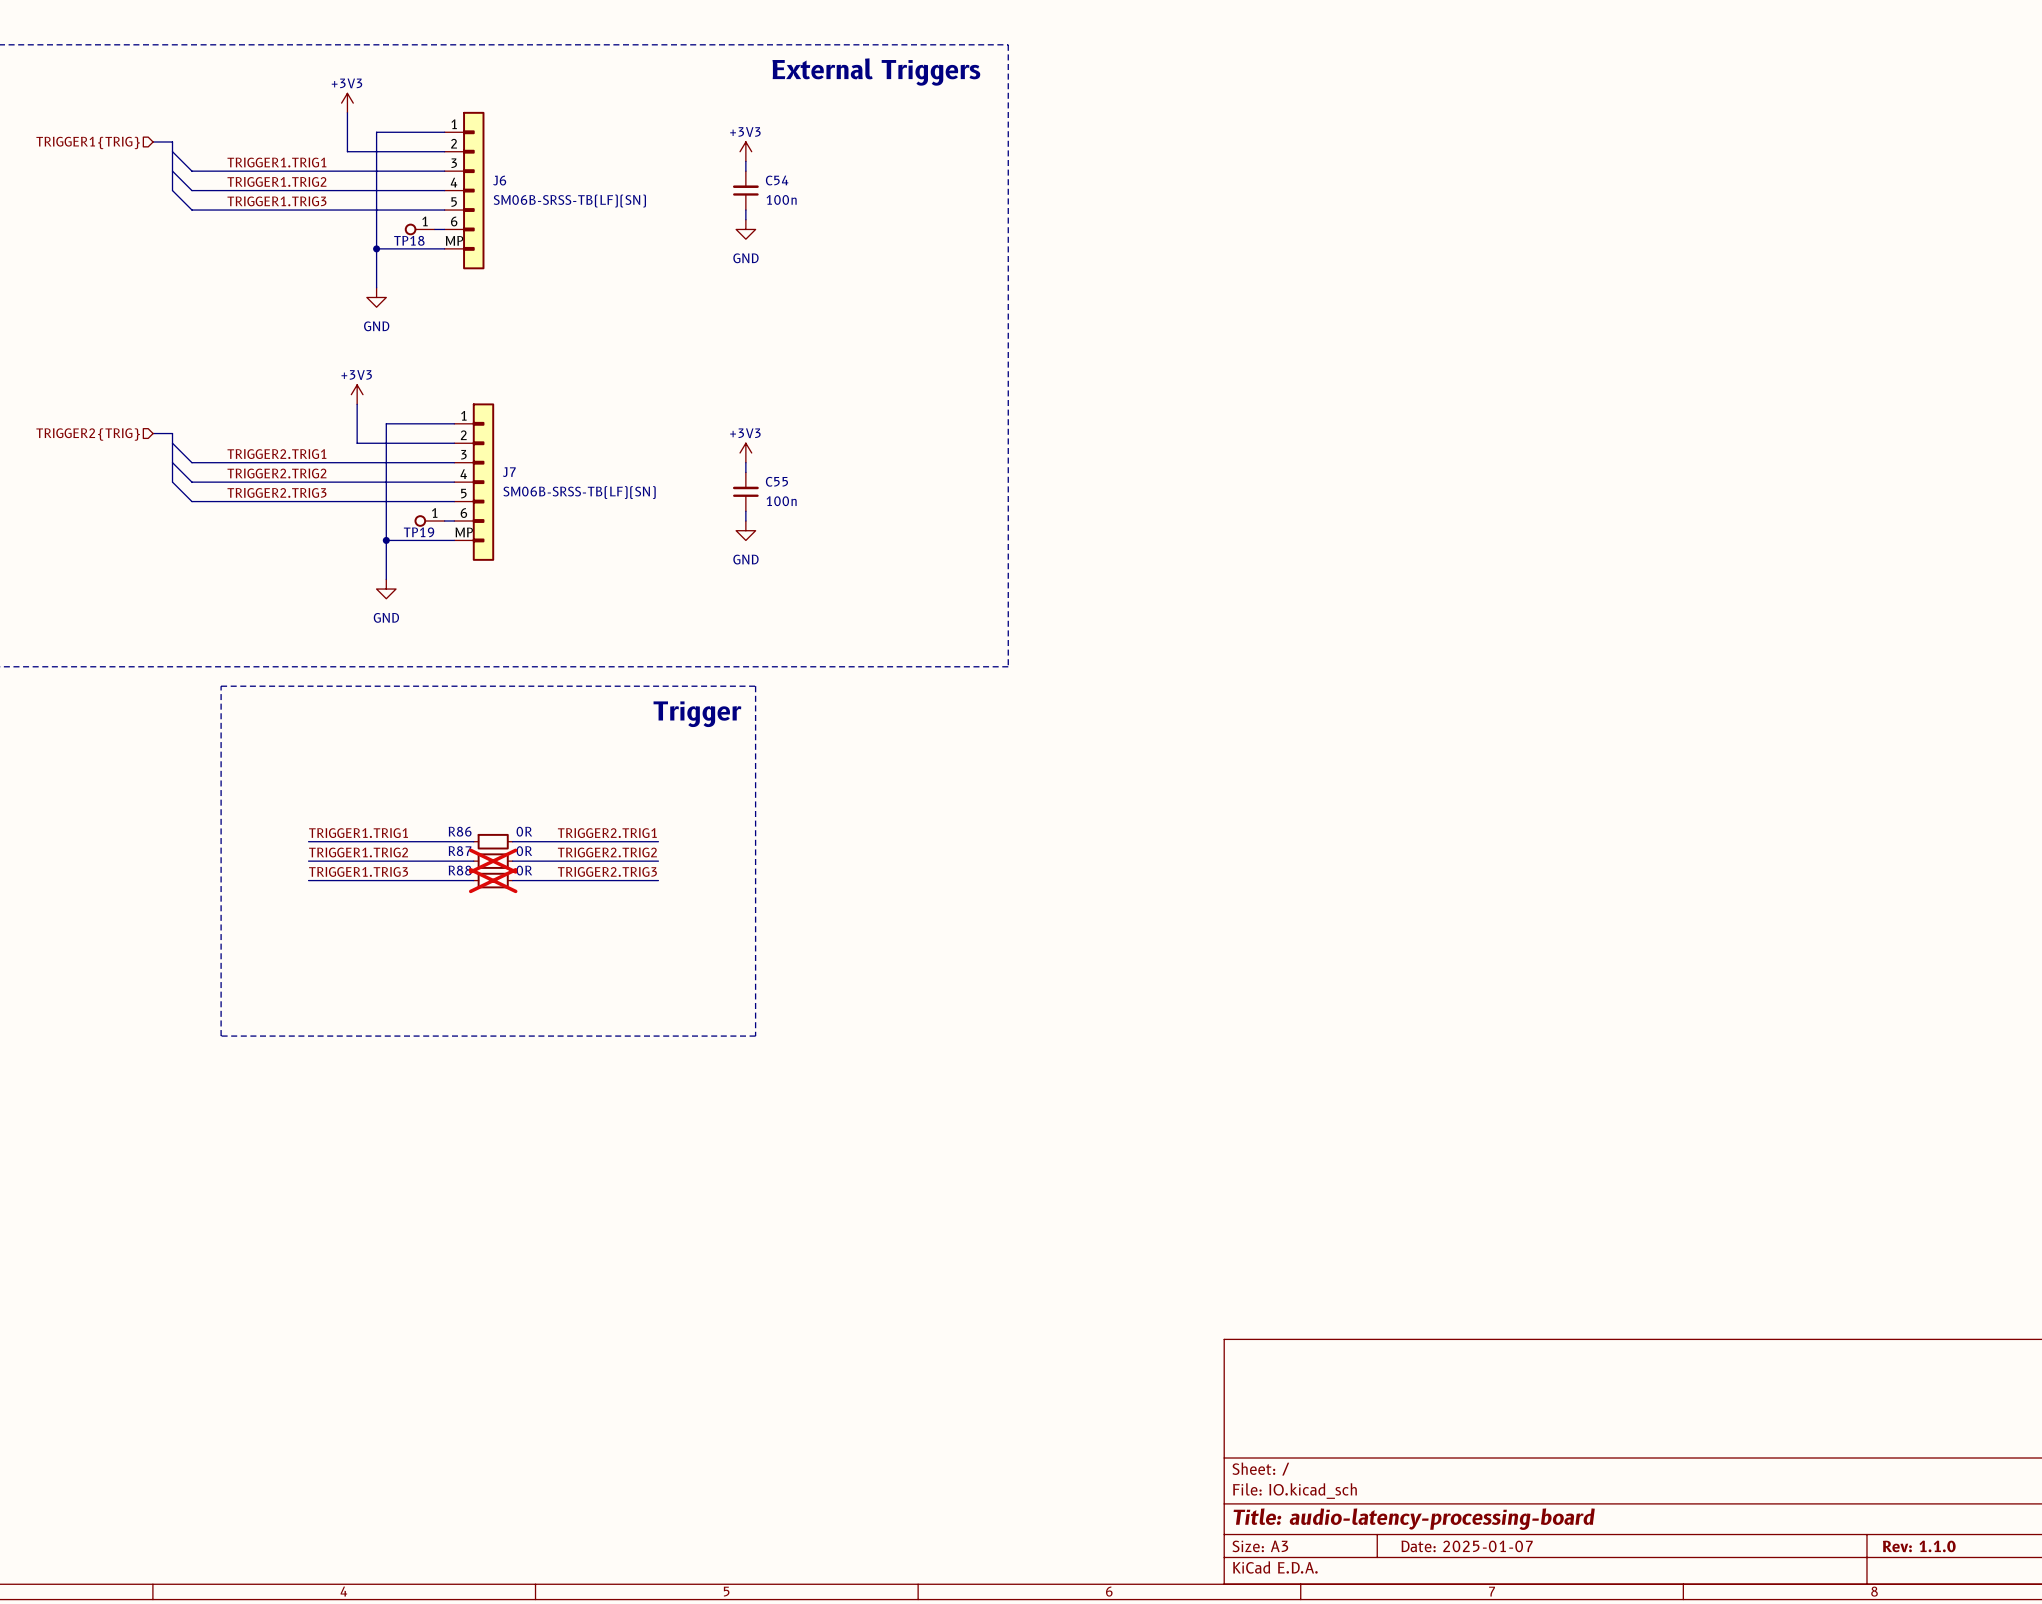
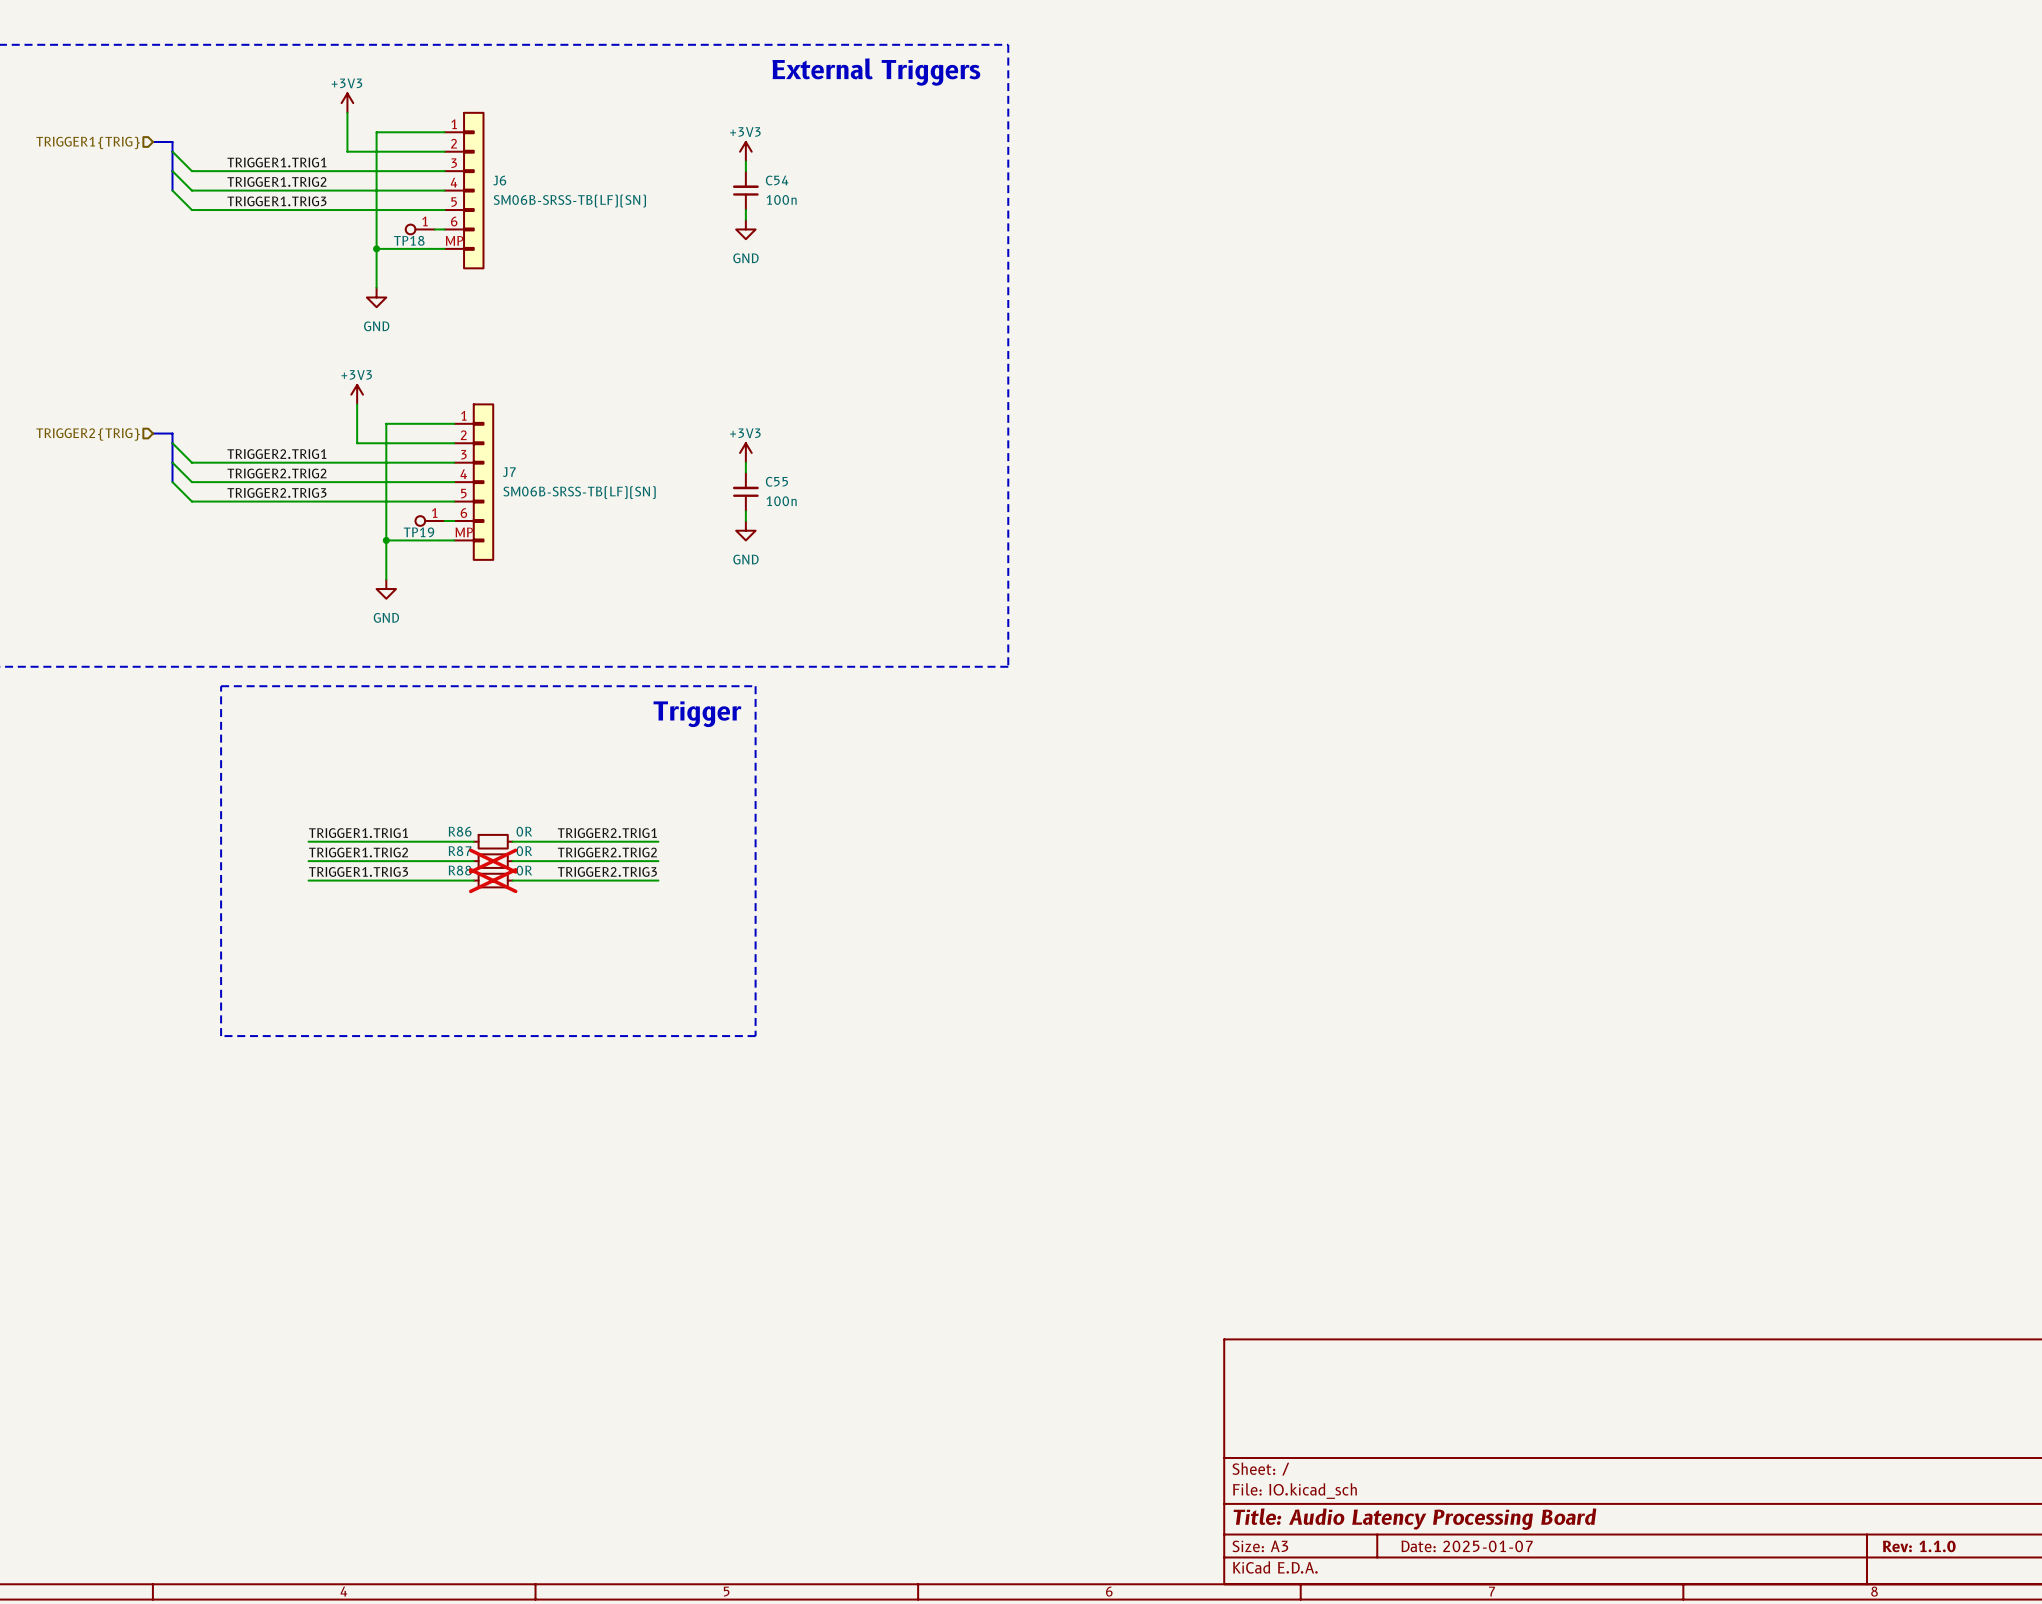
title block: Title: audio-latency-processing-board (1414, 1519) -> Title: Audio Latency Processing Board (1414, 1519)

